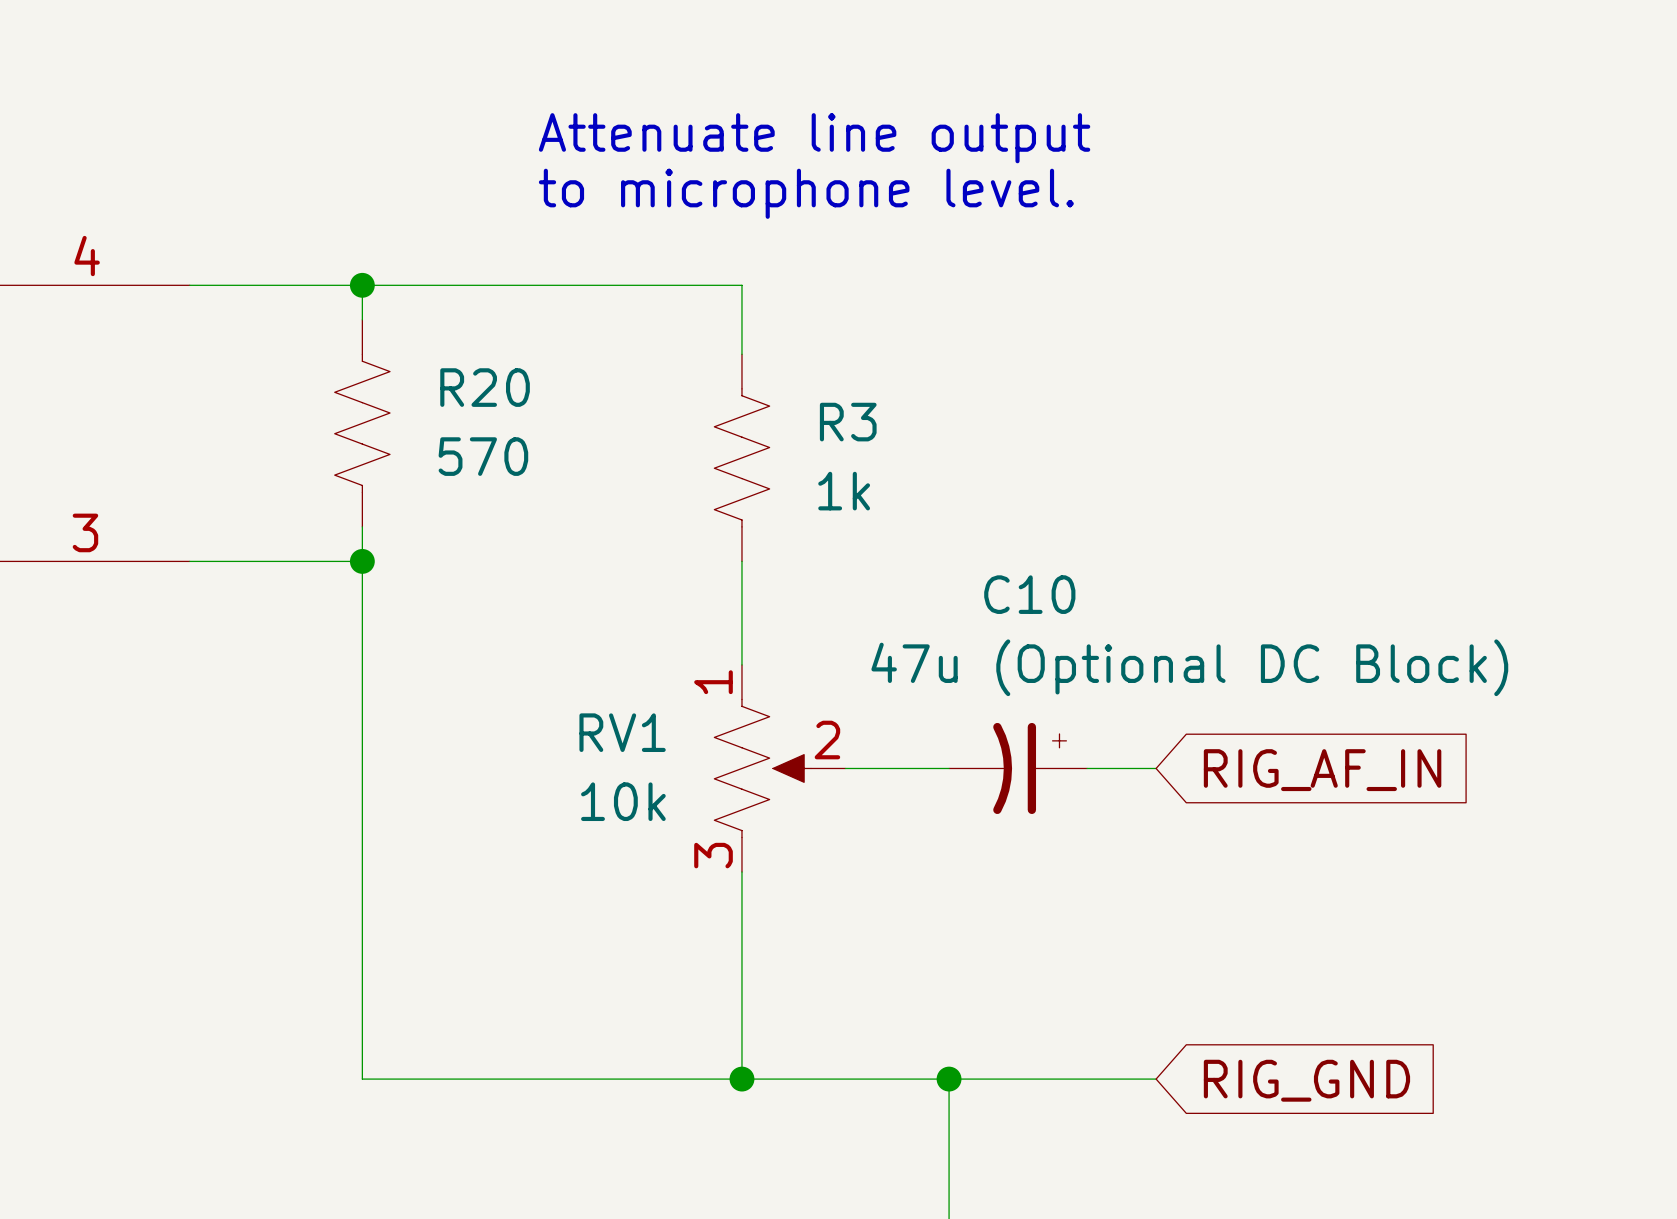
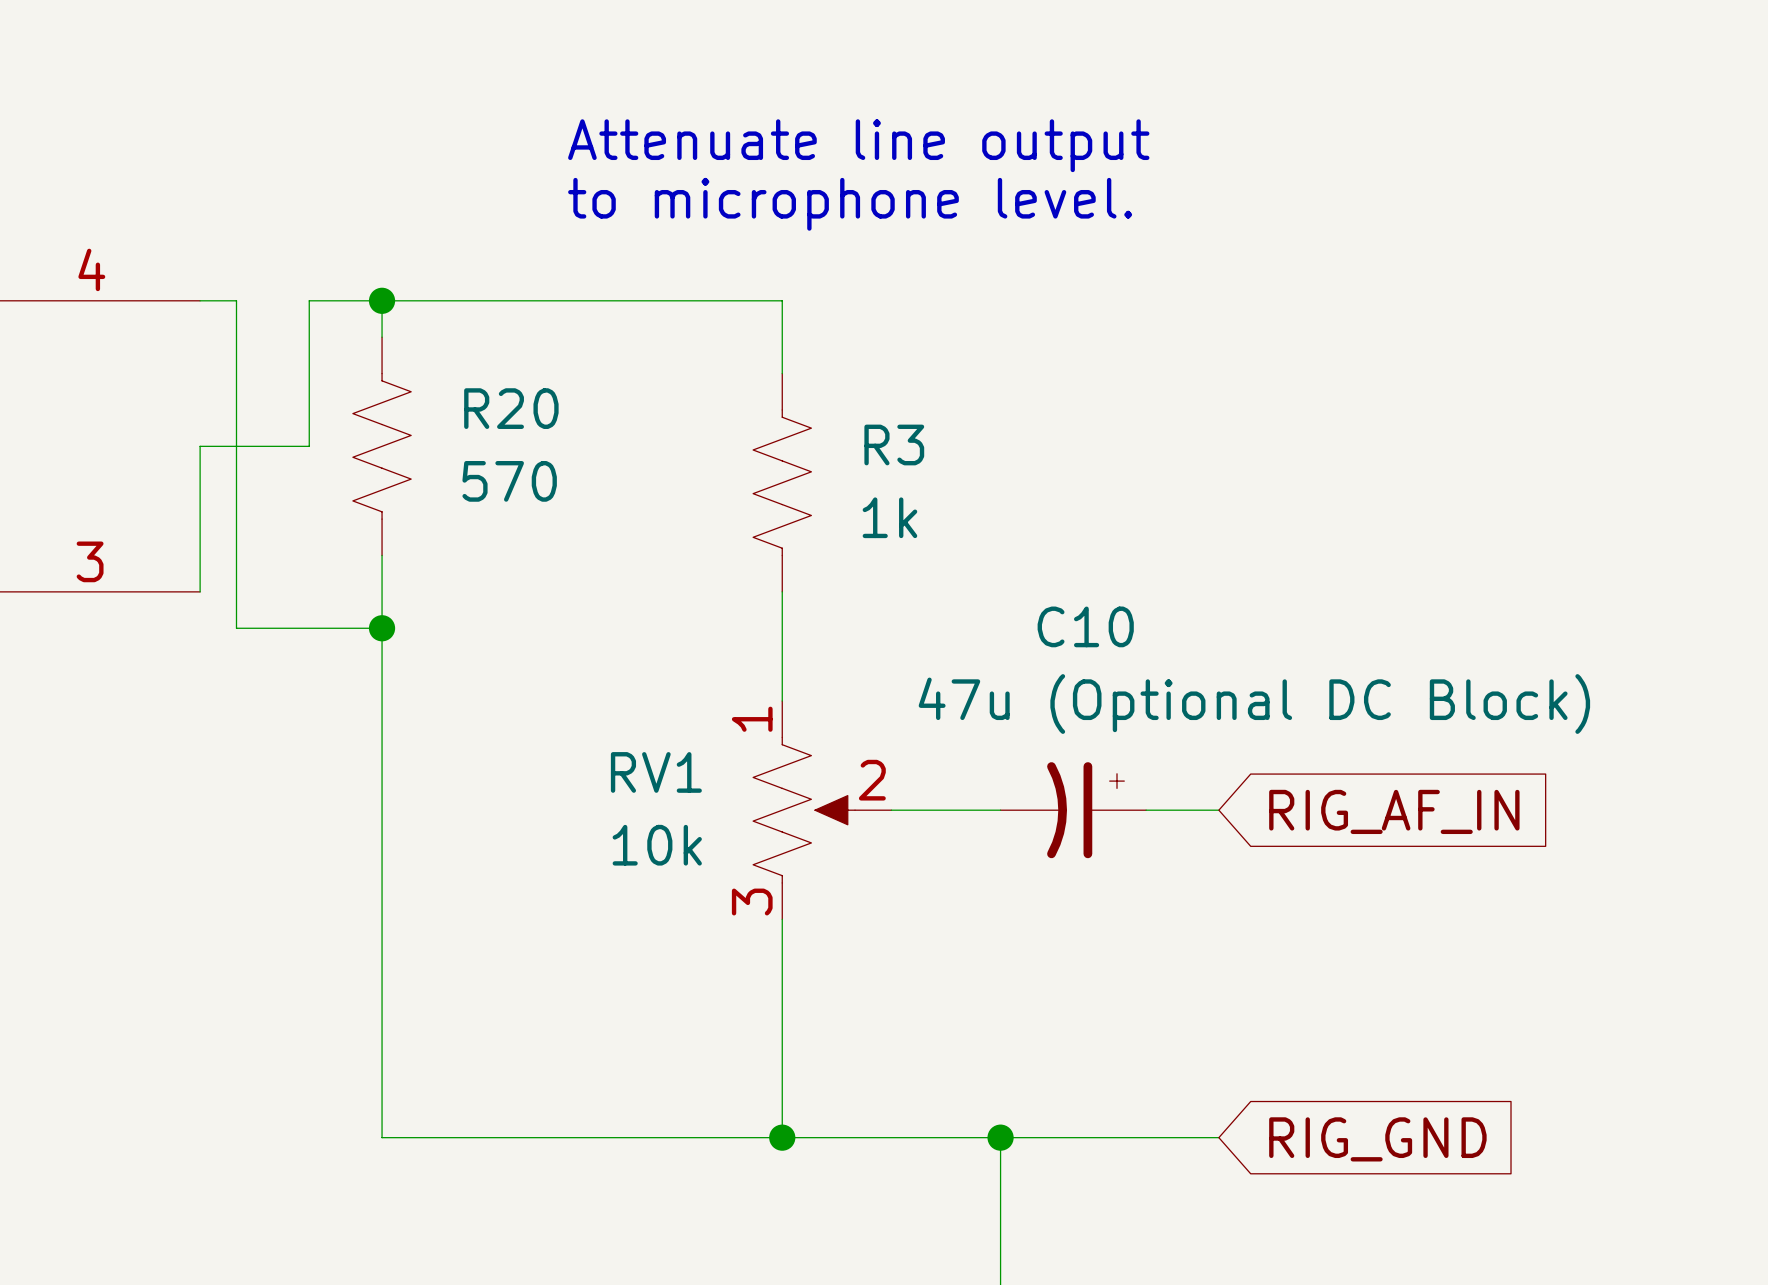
wire: (224, 285) (293, 285) -> (200, 591) (200, 446) (309, 446) (309, 300)
wire: none -> (236, 300) (236, 628) (382, 628)
wire: (189, 561) (362, 561) -> none
junction position: (362, 561) -> (382, 628)

